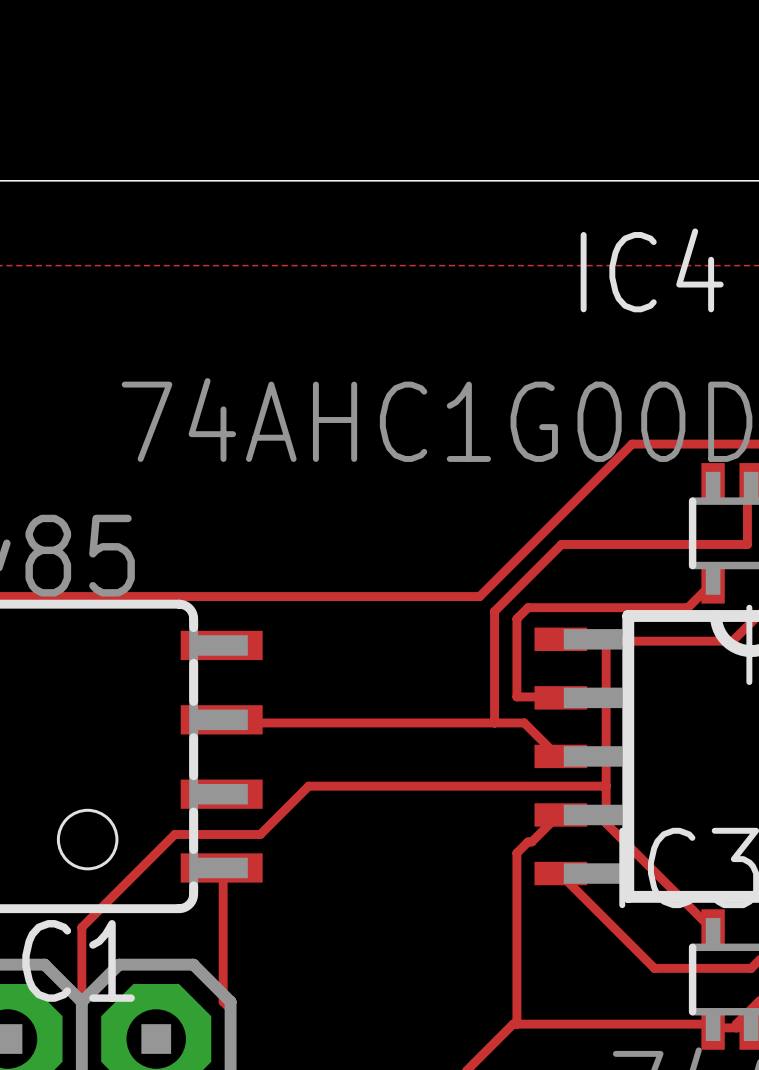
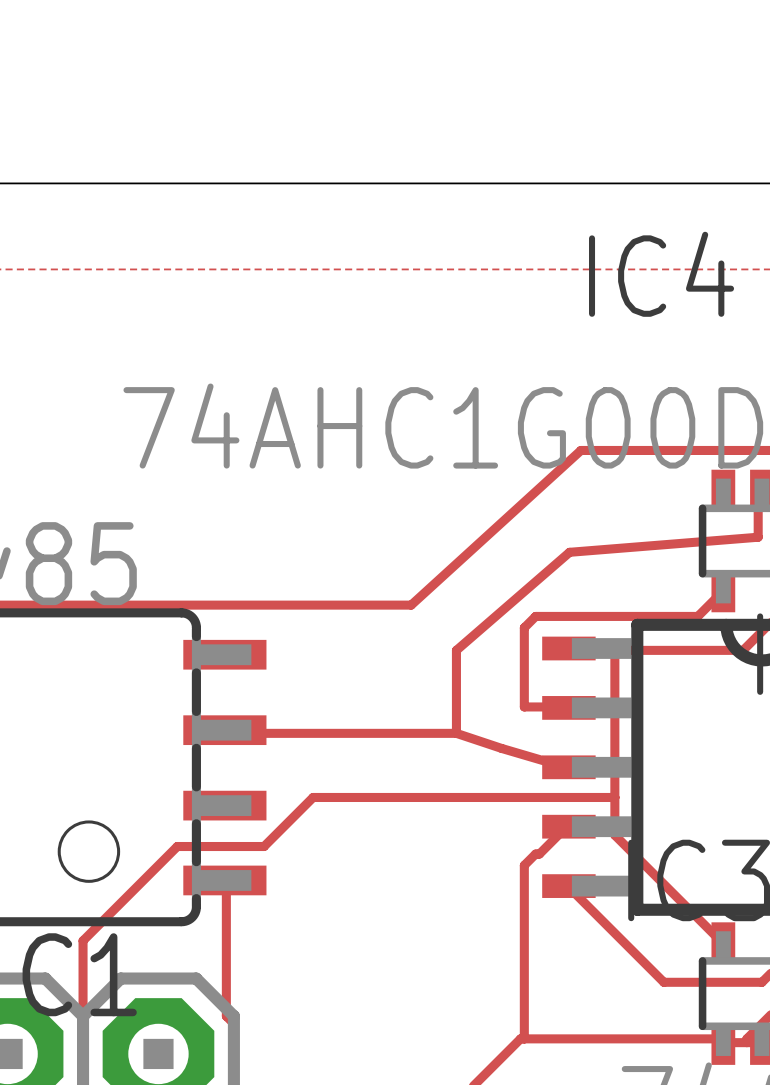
track: (632, 444) (479, 596) (405, 596) -> (641, 450) (580, 450) (411, 605)
track: (747, 529) (747, 544) (561, 544) (494, 611) (494, 722) -> (758, 537) (569, 552) (456, 650) (456, 733) (565, 767)
track: (449, 722) (524, 722) (557, 756) -> none

